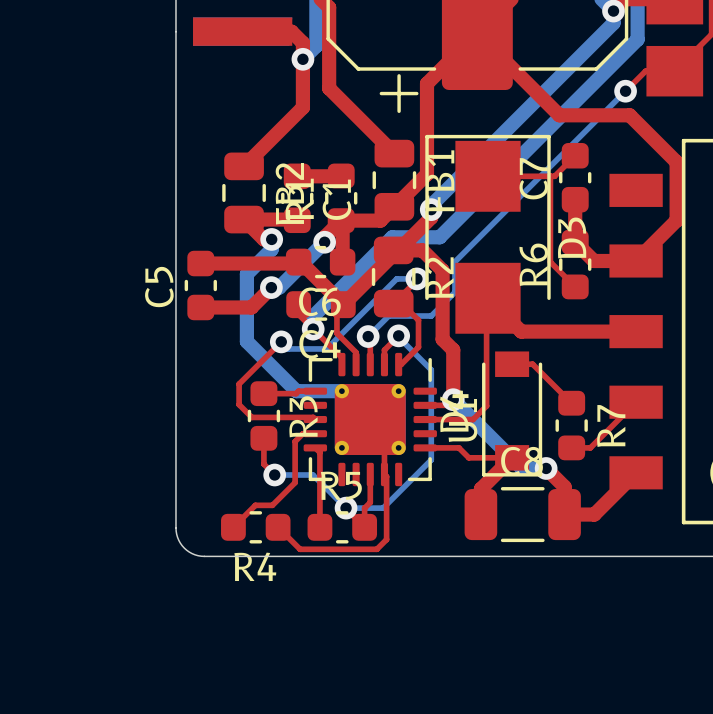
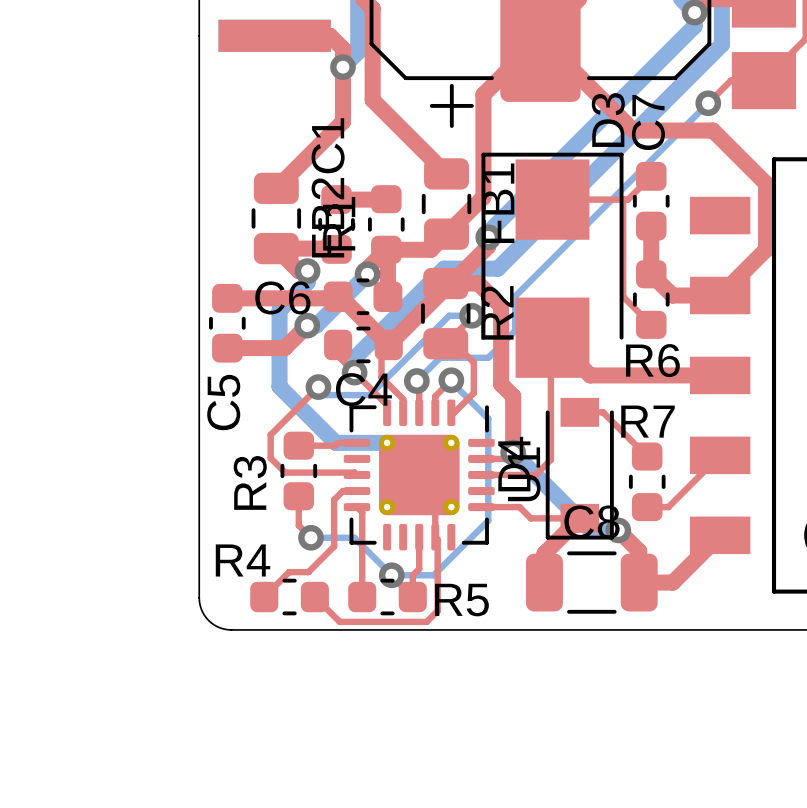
C7 name position: C7 (533, 178) -> C7 (648, 122)
C1 name position: C1 (336, 199) -> C1 (328, 145)
D3 name position: D3 (572, 237) -> D3 (608, 120)
R6 name rotation: 0° (533, 264) -> 90° clockwise (652, 360)
C5 name position: C5 (159, 287) -> C5 (223, 402)
C6 name position: C6 (319, 301) -> C6 (282, 297)
R3 name position: R3 (303, 416) -> R3 (250, 482)
R7 name rotation: 0° (611, 425) -> 90° clockwise (647, 421)
R5 name position: R5 (341, 485) -> R5 (461, 600)
R4 name position: R4 (255, 566) -> R4 (243, 560)

